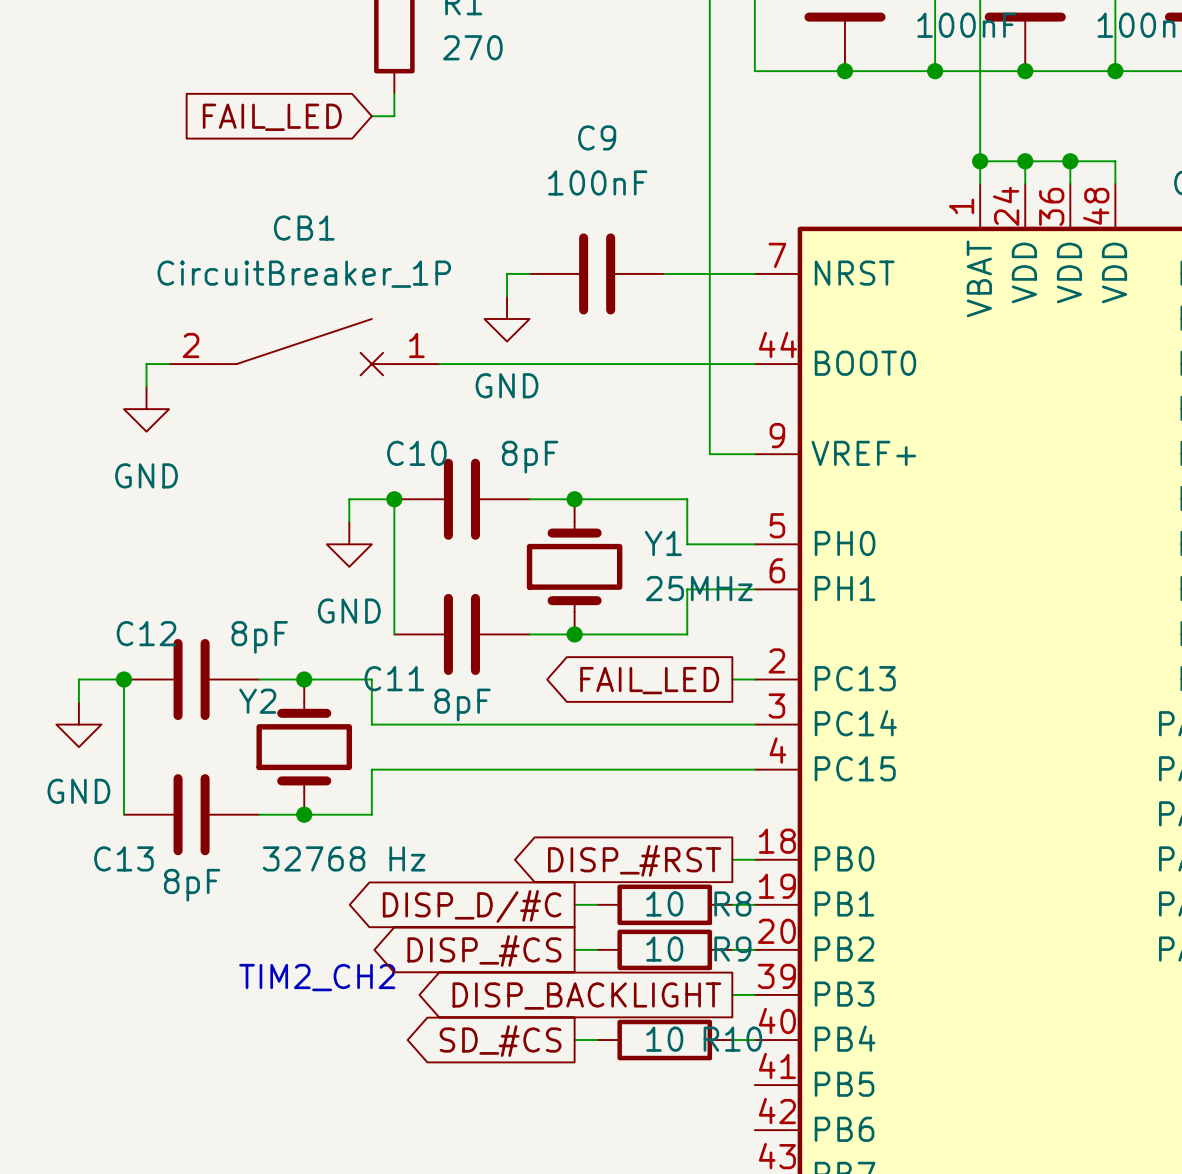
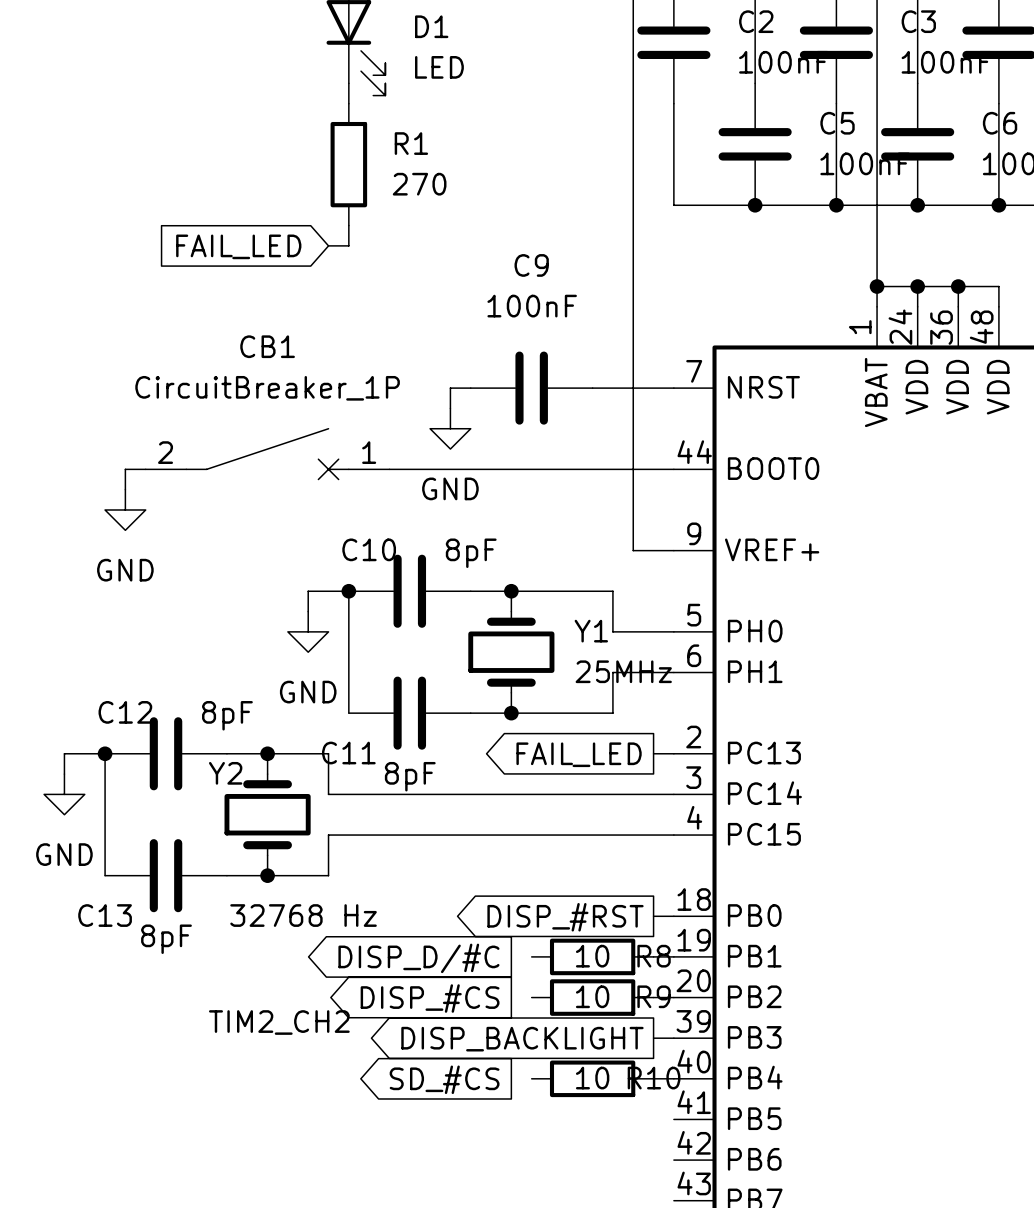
wire: (574, 904) (597, 904) -> none
wire: (574, 949) (597, 949) -> none
wire: (574, 1040) (597, 1040) -> none

